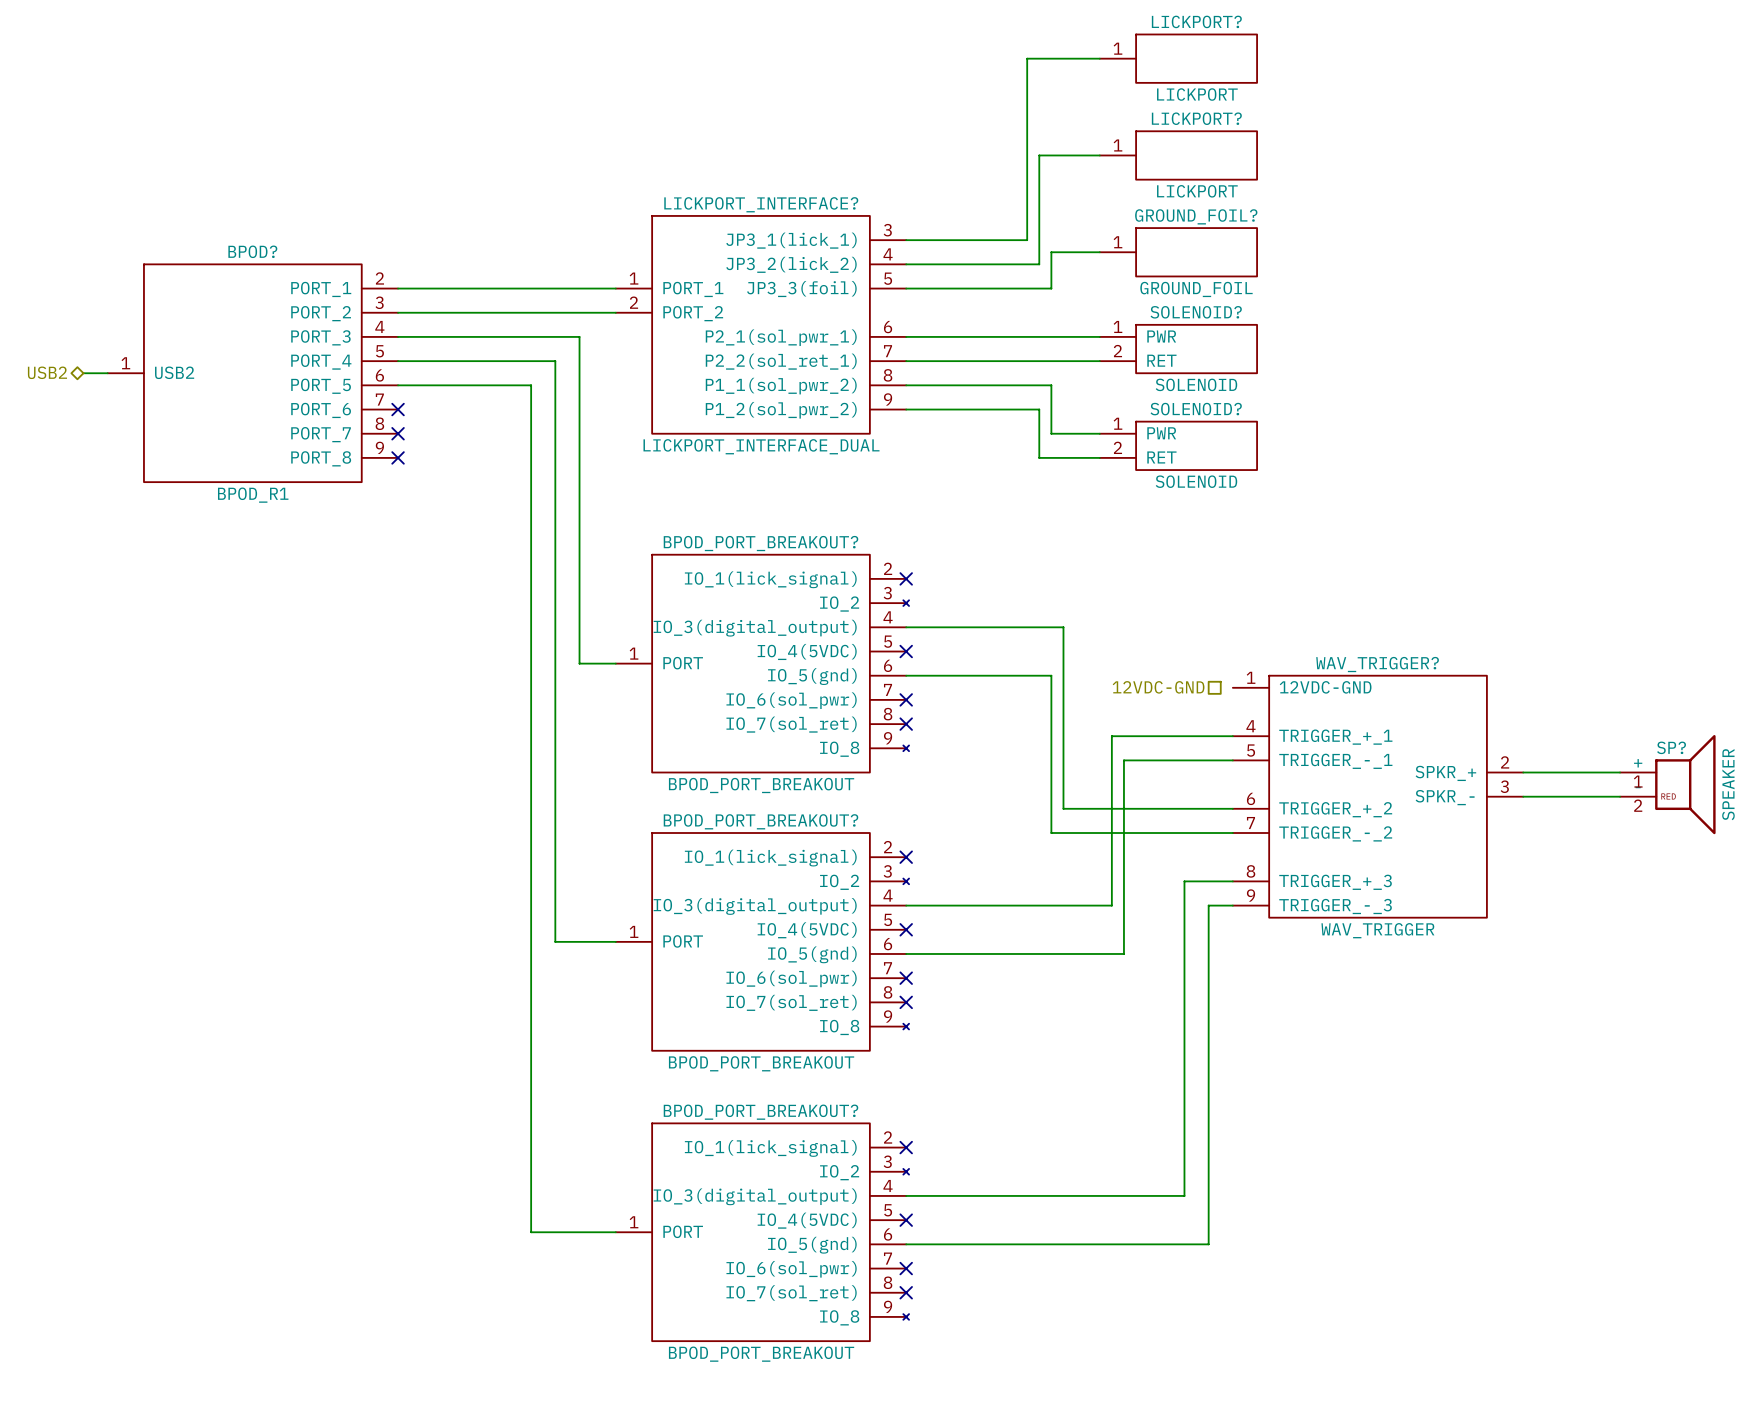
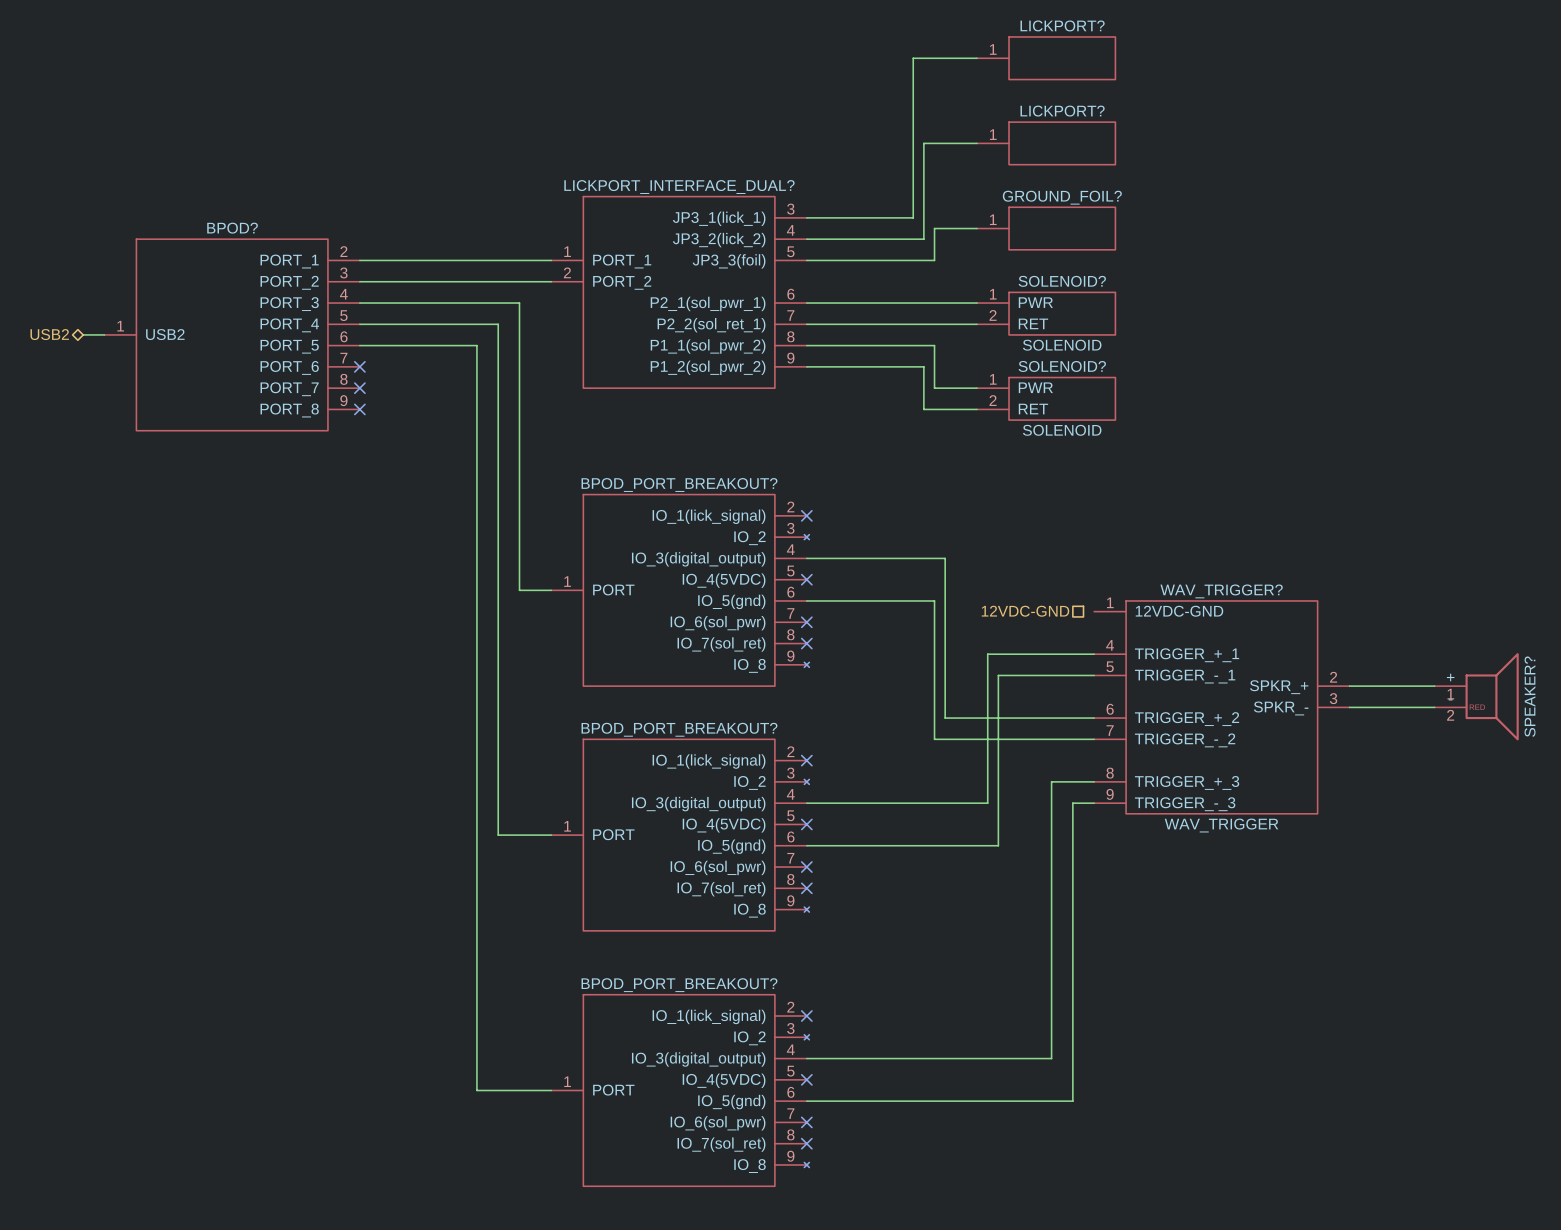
LICKPORT? value: LICKPORT (1197, 94) -> none
LICKPORT? value: LICKPORT (1197, 191) -> none
LICKPORT_INTERFACE? name: LICKPORT_INTERFACE? (761, 204) -> LICKPORT_INTERFACE_DUAL? (679, 187)
GROUND_FOIL? value: GROUND_FOIL (1196, 289) -> none
LICKPORT_INTERFACE? value: LICKPORT_INTERFACE_DUAL (761, 446) -> none
BPOD? value: BPOD_R1 (253, 495) -> none
SP? name: SP? (1671, 747) -> SPEAKER? (1530, 696)
SP? value: SPEAKER (1728, 784) -> none
BPOD_PORT_BREAKOUT? value: BPOD_PORT_BREAKOUT (761, 785) -> none
BPOD_PORT_BREAKOUT? value: BPOD_PORT_BREAKOUT (761, 1063) -> none
BPOD_PORT_BREAKOUT? value: BPOD_PORT_BREAKOUT (761, 1354) -> none

